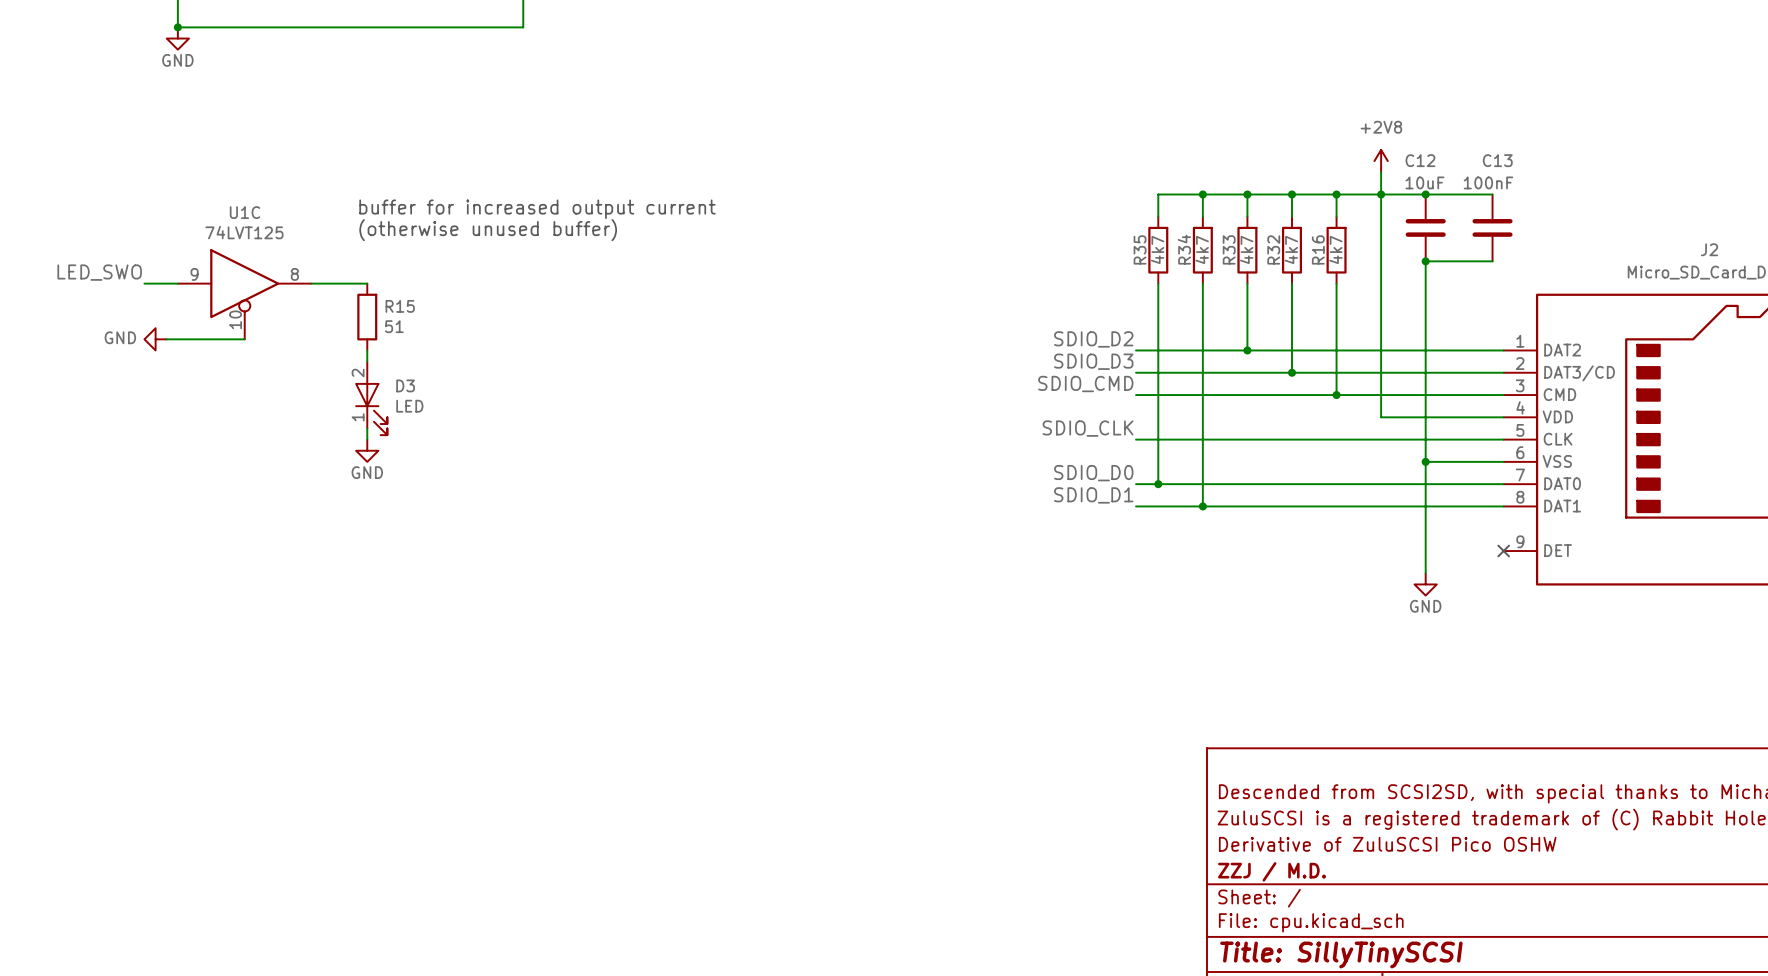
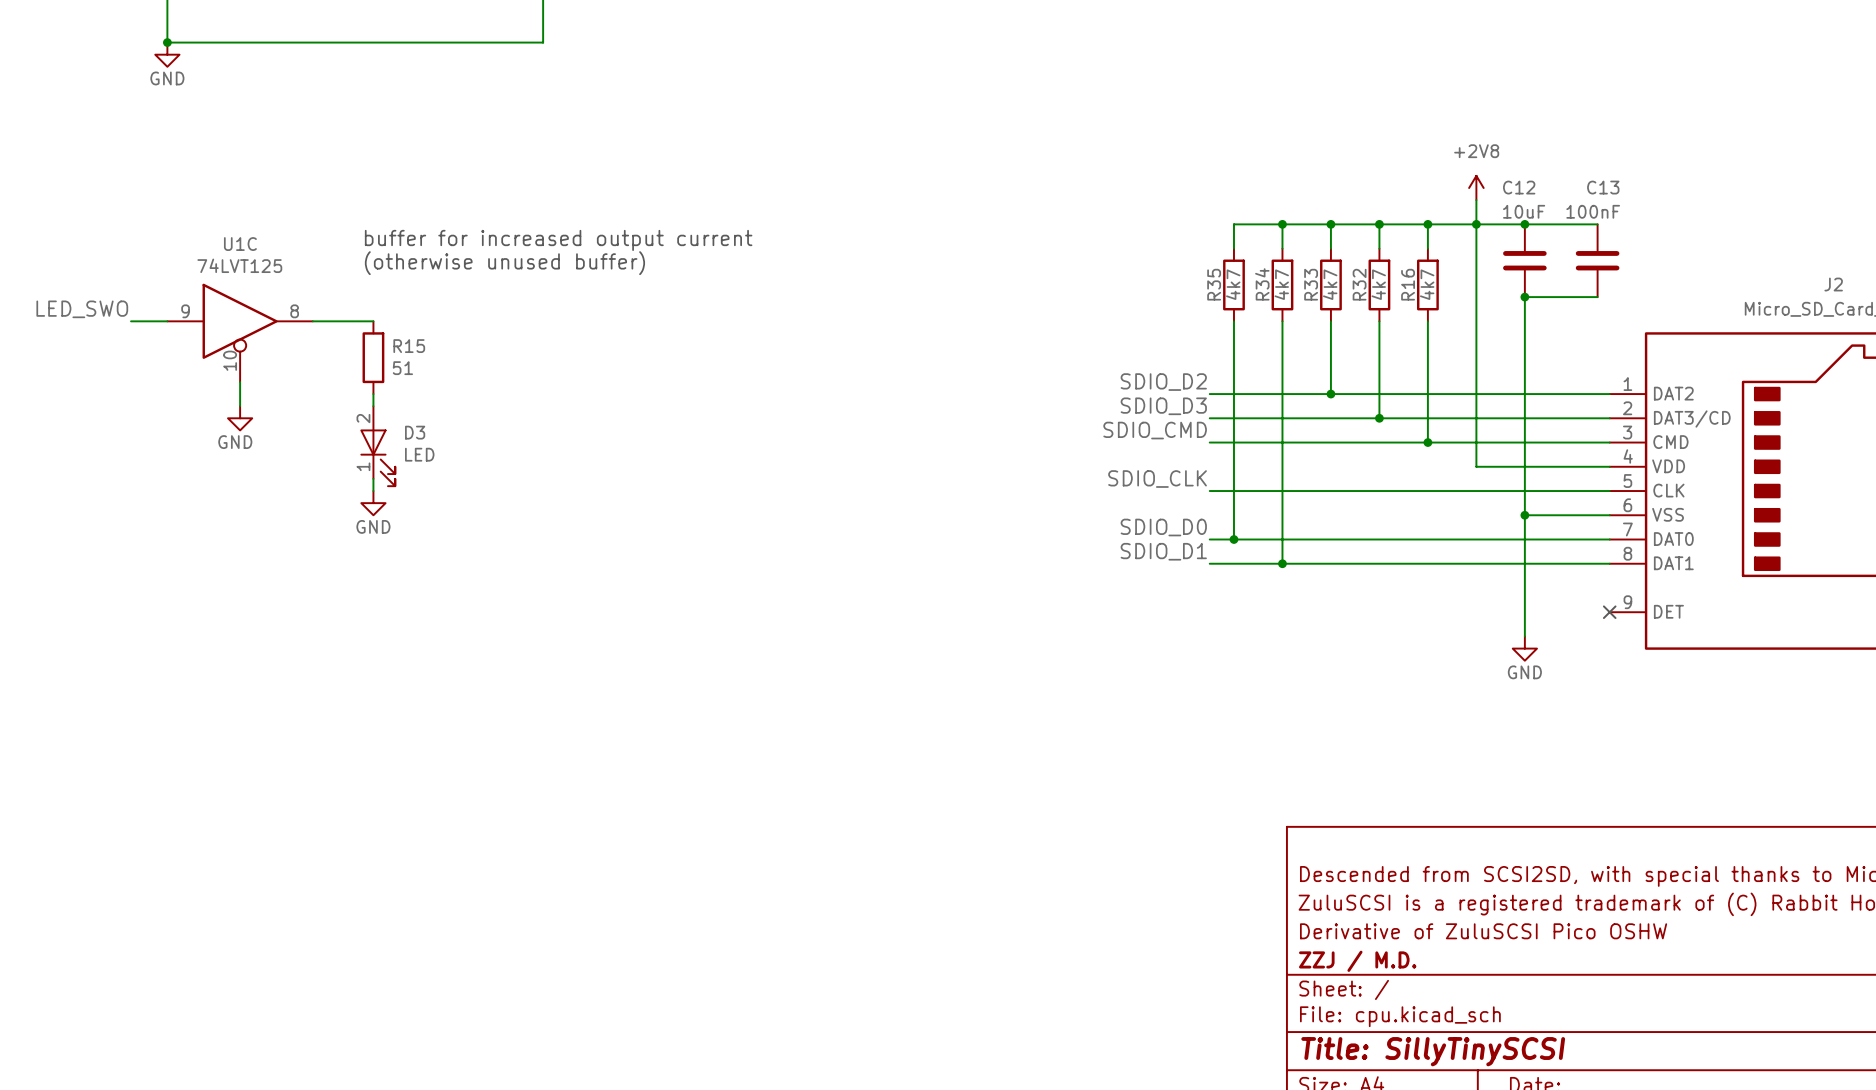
power symbol rotation: 0° (155, 339) -> 90° counterclockwise (240, 418)
power symbol position: GND (155, 339) -> GND (240, 418)
wire: (166, 339) (244, 339) -> (240, 406) (240, 381)

